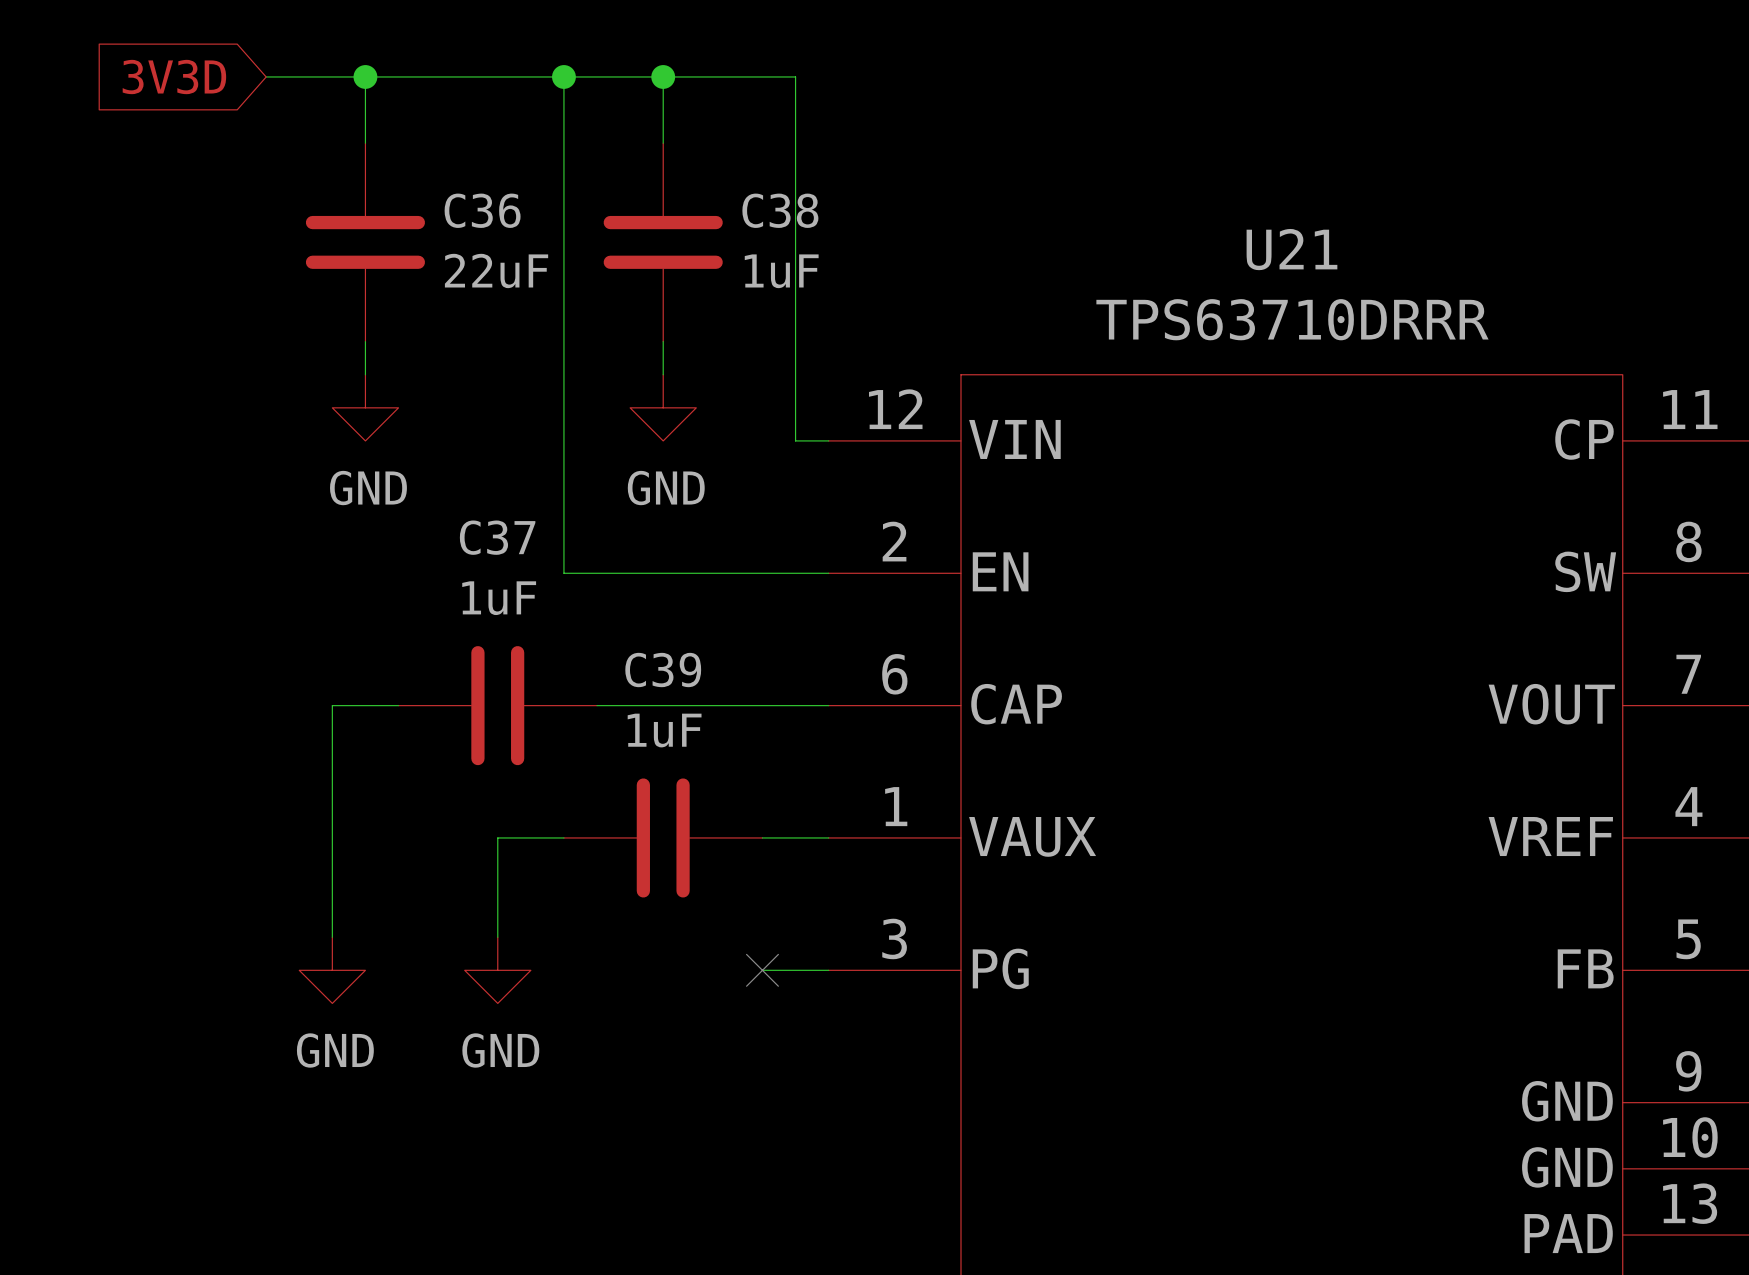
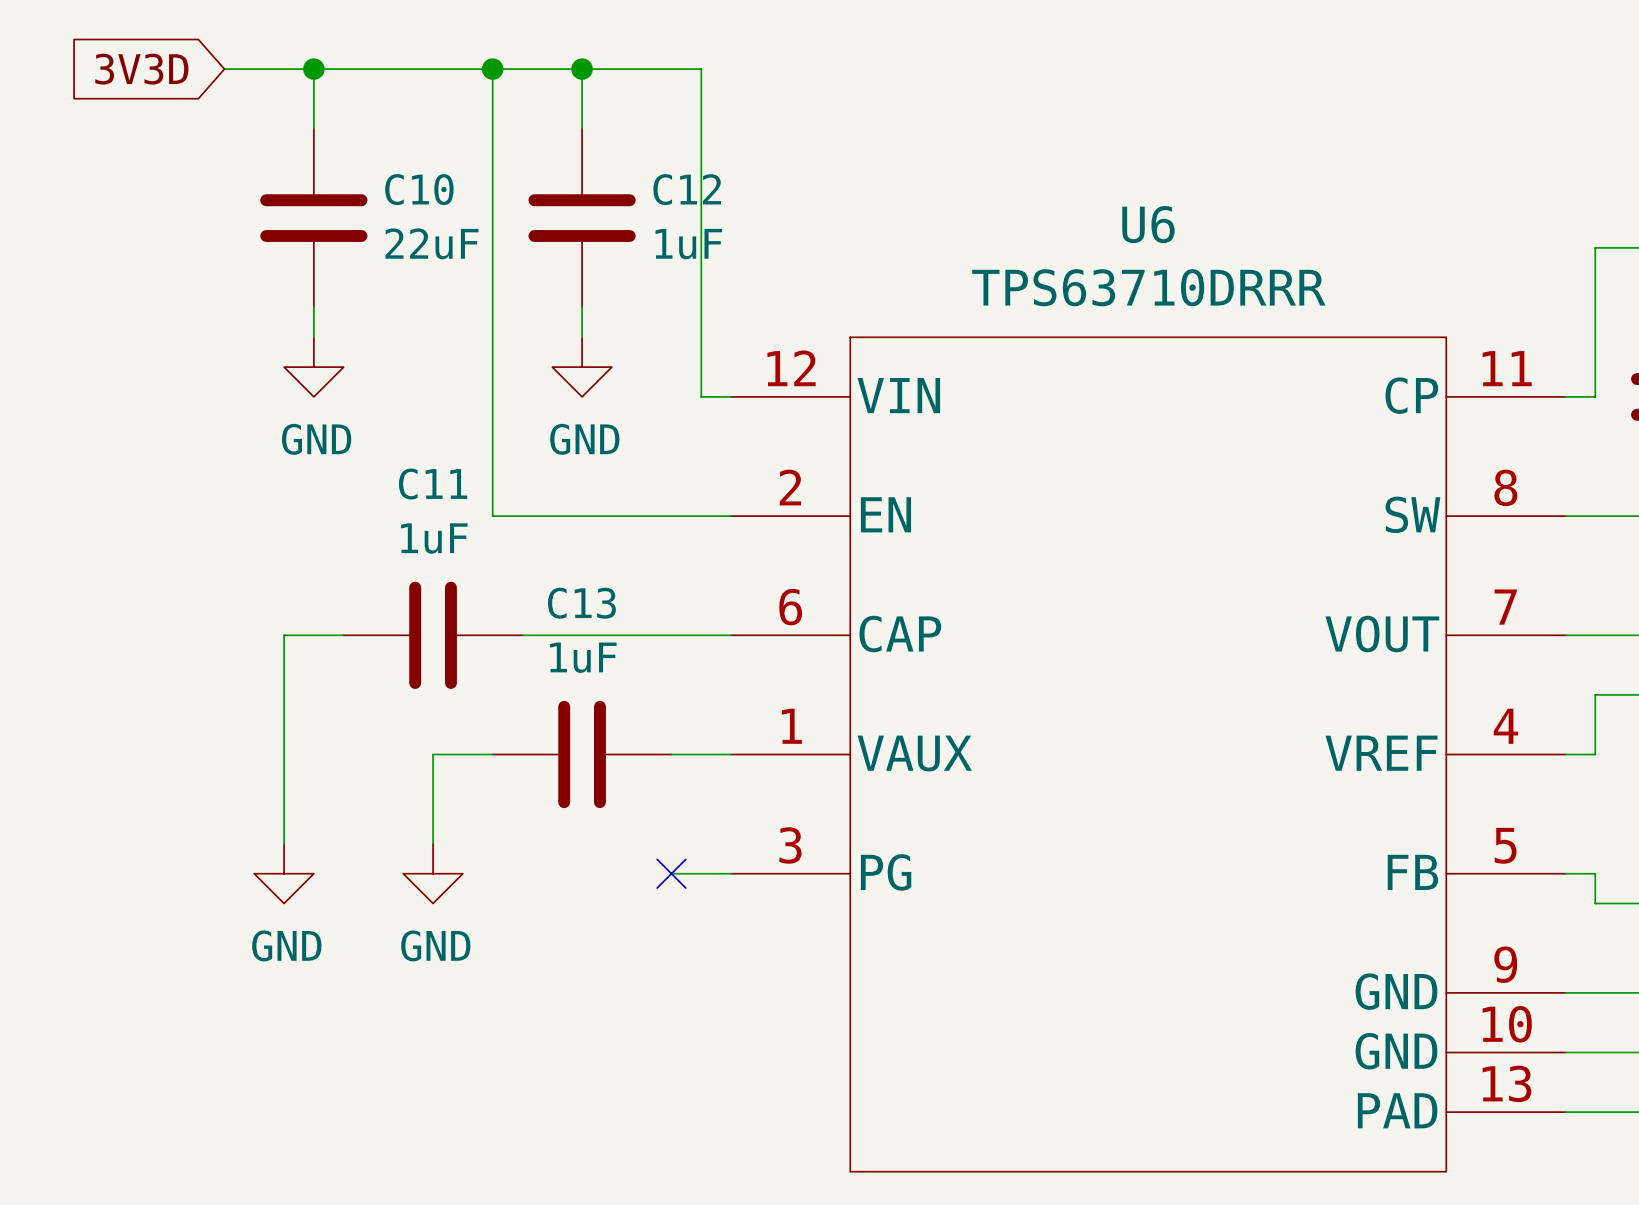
C36 name: C36 (482, 210) -> C10 (419, 189)
C38 name: C38 (780, 210) -> C12 (687, 189)
U21 name: U21 (1291, 249) -> U6 (1148, 224)
C37 name: C37 (497, 537) -> C11 (433, 484)
C39 name: C39 (663, 670) -> C13 (581, 603)

